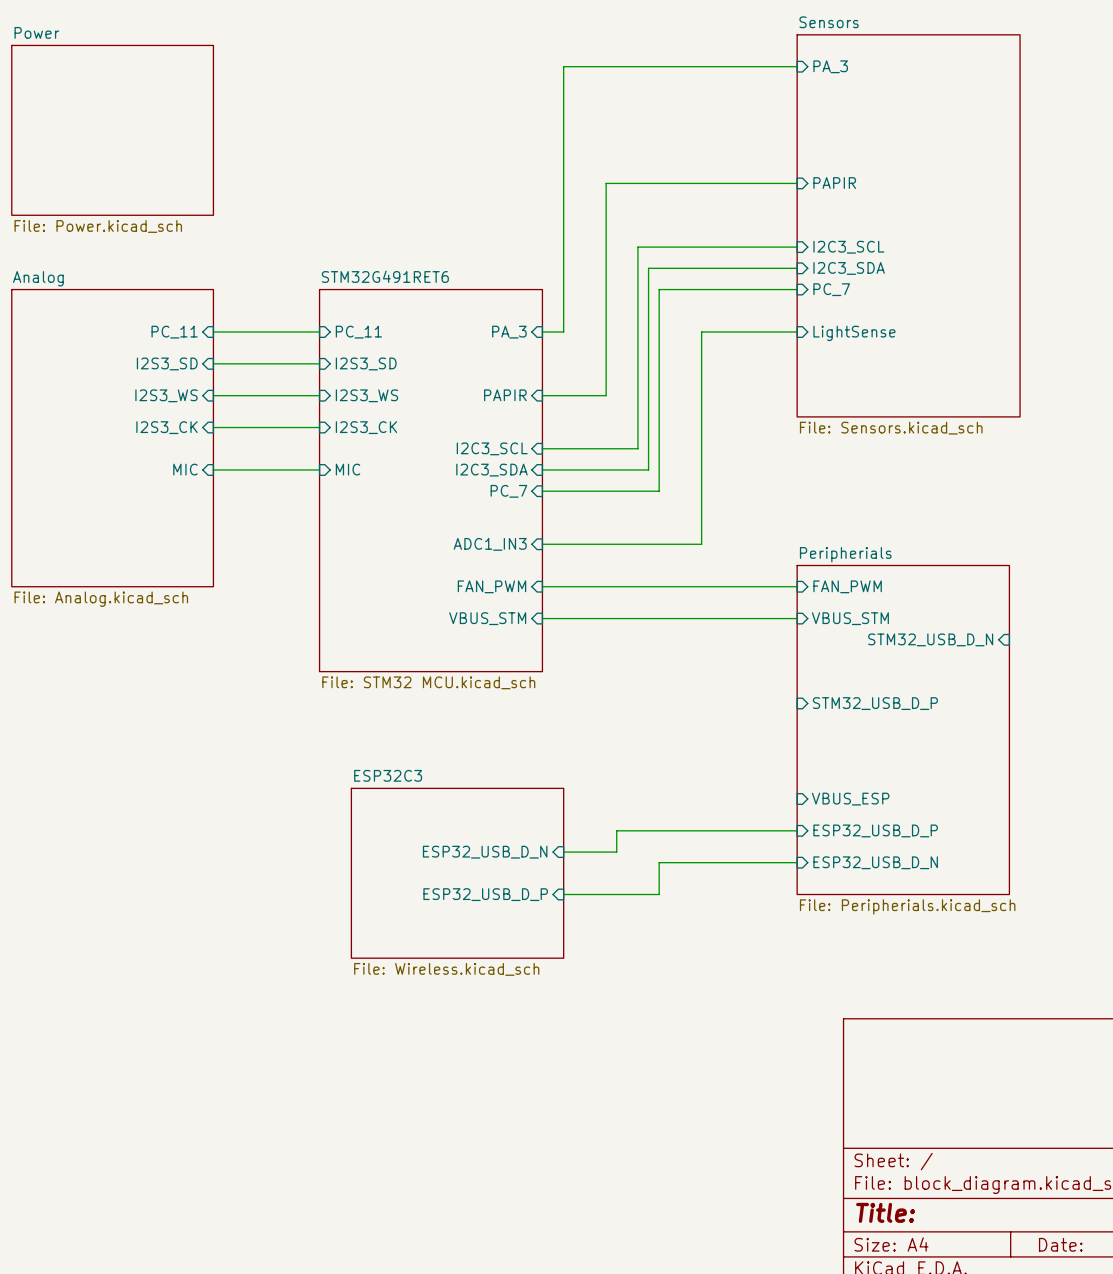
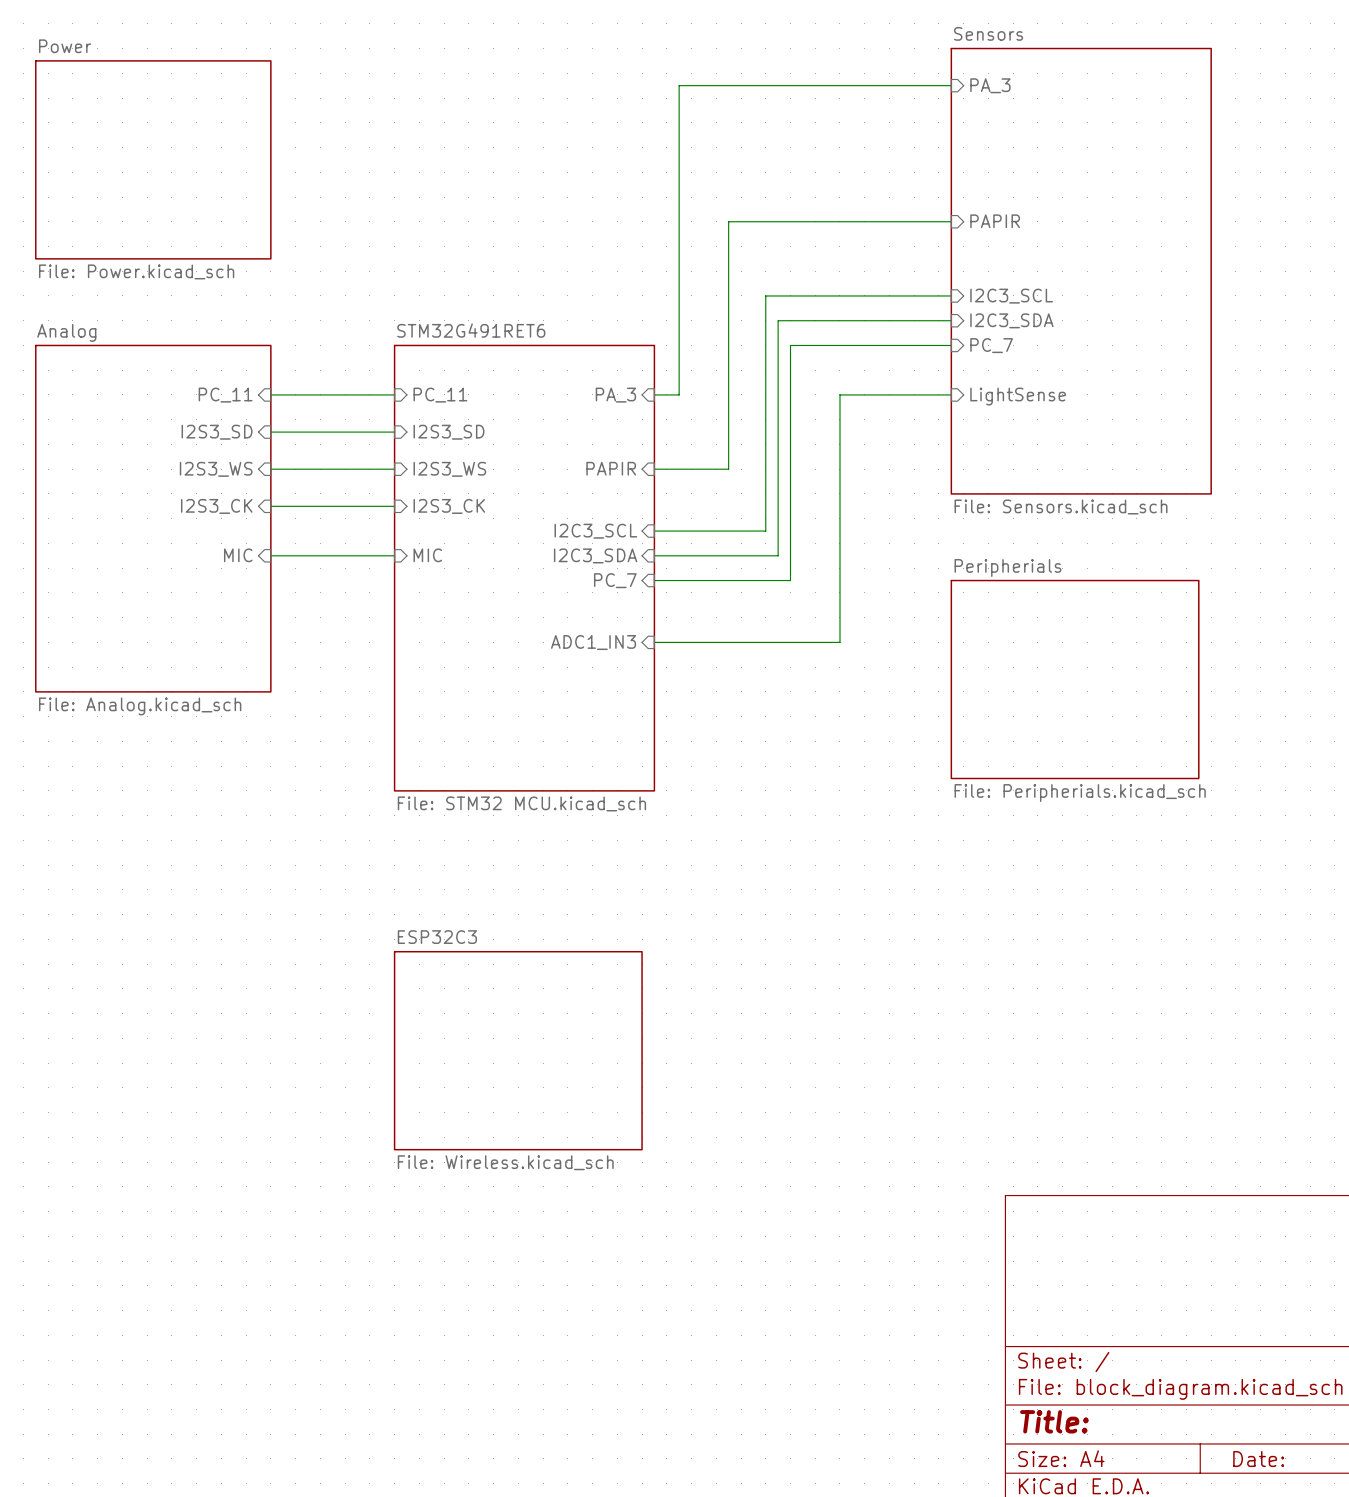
sheet Peripherials: none -> File: Peripherials.kicad_sch (1075, 679)
sheet pin: FAN_PWM (491, 586) -> none
wire: (542, 586) (797, 586) -> none
sheet pin: FAN_PWM (847, 586) -> none
sheet pin: VBUS_STM (487, 618) -> none
wire: (542, 618) (797, 618) -> none
sheet pin: VBUS_STM (850, 618) -> none
sheet pin: STM32_USB_D_N (930, 639) -> none
sheet pin: STM32_USB_D_P (875, 703) -> none
sheet Peripherials: File: Peripherials.kicad_sch (903, 730) -> none
sheet pin: VBUS_ESP (850, 799) -> none
wire: (797, 830) (616, 830) (616, 852) (563, 852) -> none
sheet pin: ESP32_USB_D_P (875, 830) -> none
sheet pin: ESP32_USB_D_N (485, 852) -> none
wire: (797, 862) (659, 862) (659, 894) (563, 894) -> none
sheet pin: ESP32_USB_D_N (875, 862) -> none
sheet ESP32C3 position: (457, 873) -> (518, 1050)
sheet pin: ESP32_USB_D_P (485, 894) -> none

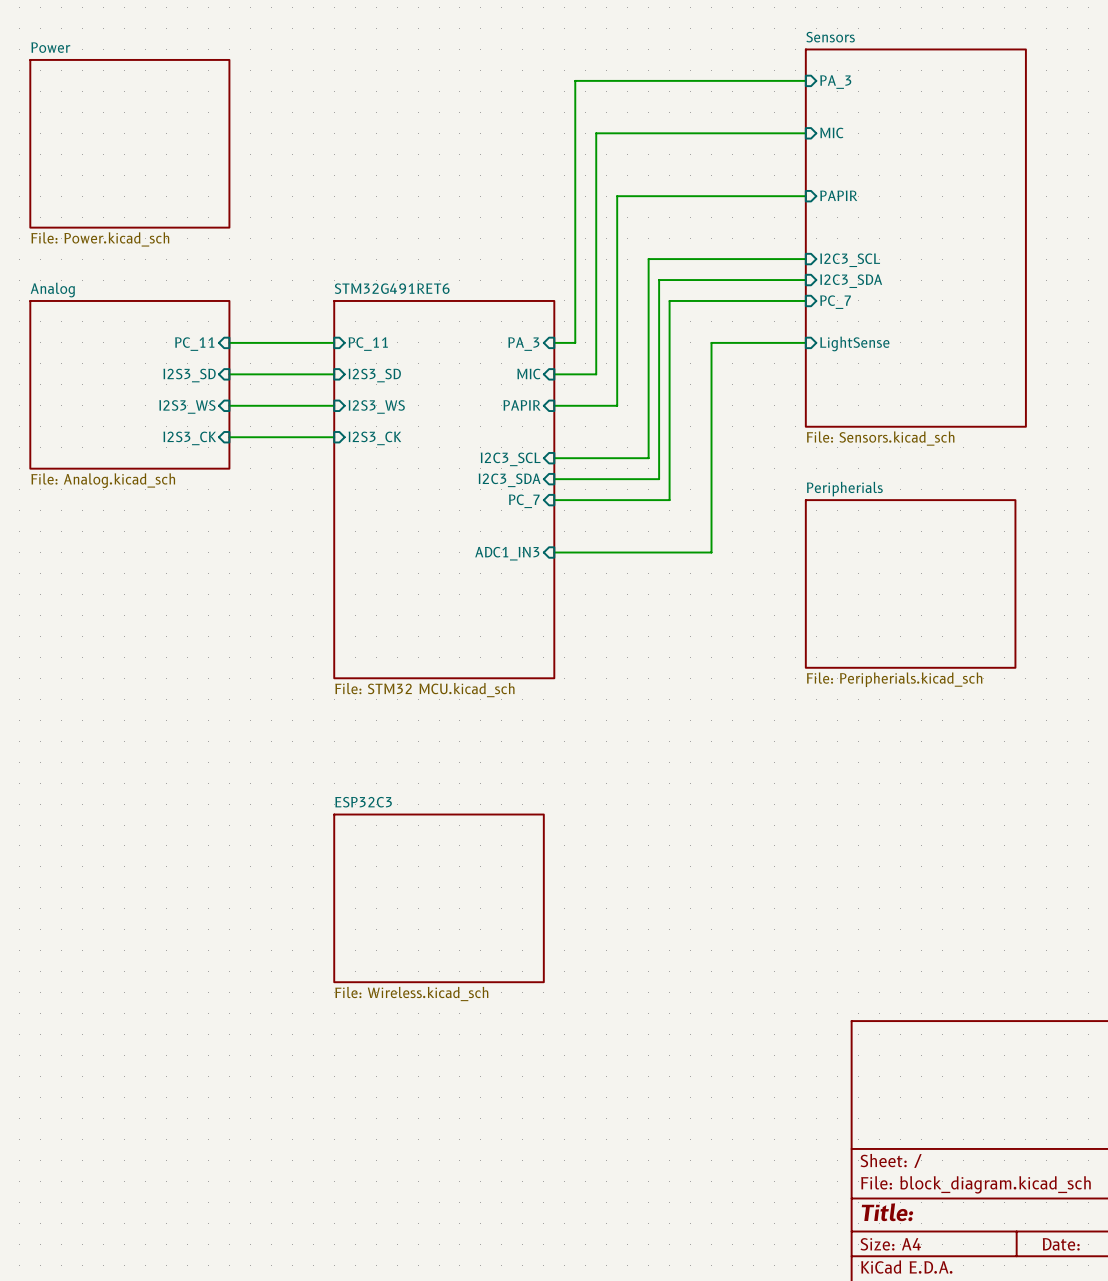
wire: none -> (805, 133) (596, 133) (596, 374) (554, 374)
sheet pin: none -> MIC (831, 132)
sheet pin: none -> MIC (528, 374)
sheet Analog: none -> File: Analog.kicad_sch (129, 384)
sheet Analog: File: Analog.kicad_sch (153, 518) -> none
sheet pin: MIC (238, 555) -> none
wire: (270, 555) (394, 555) -> none
sheet pin: MIC (427, 555) -> none

